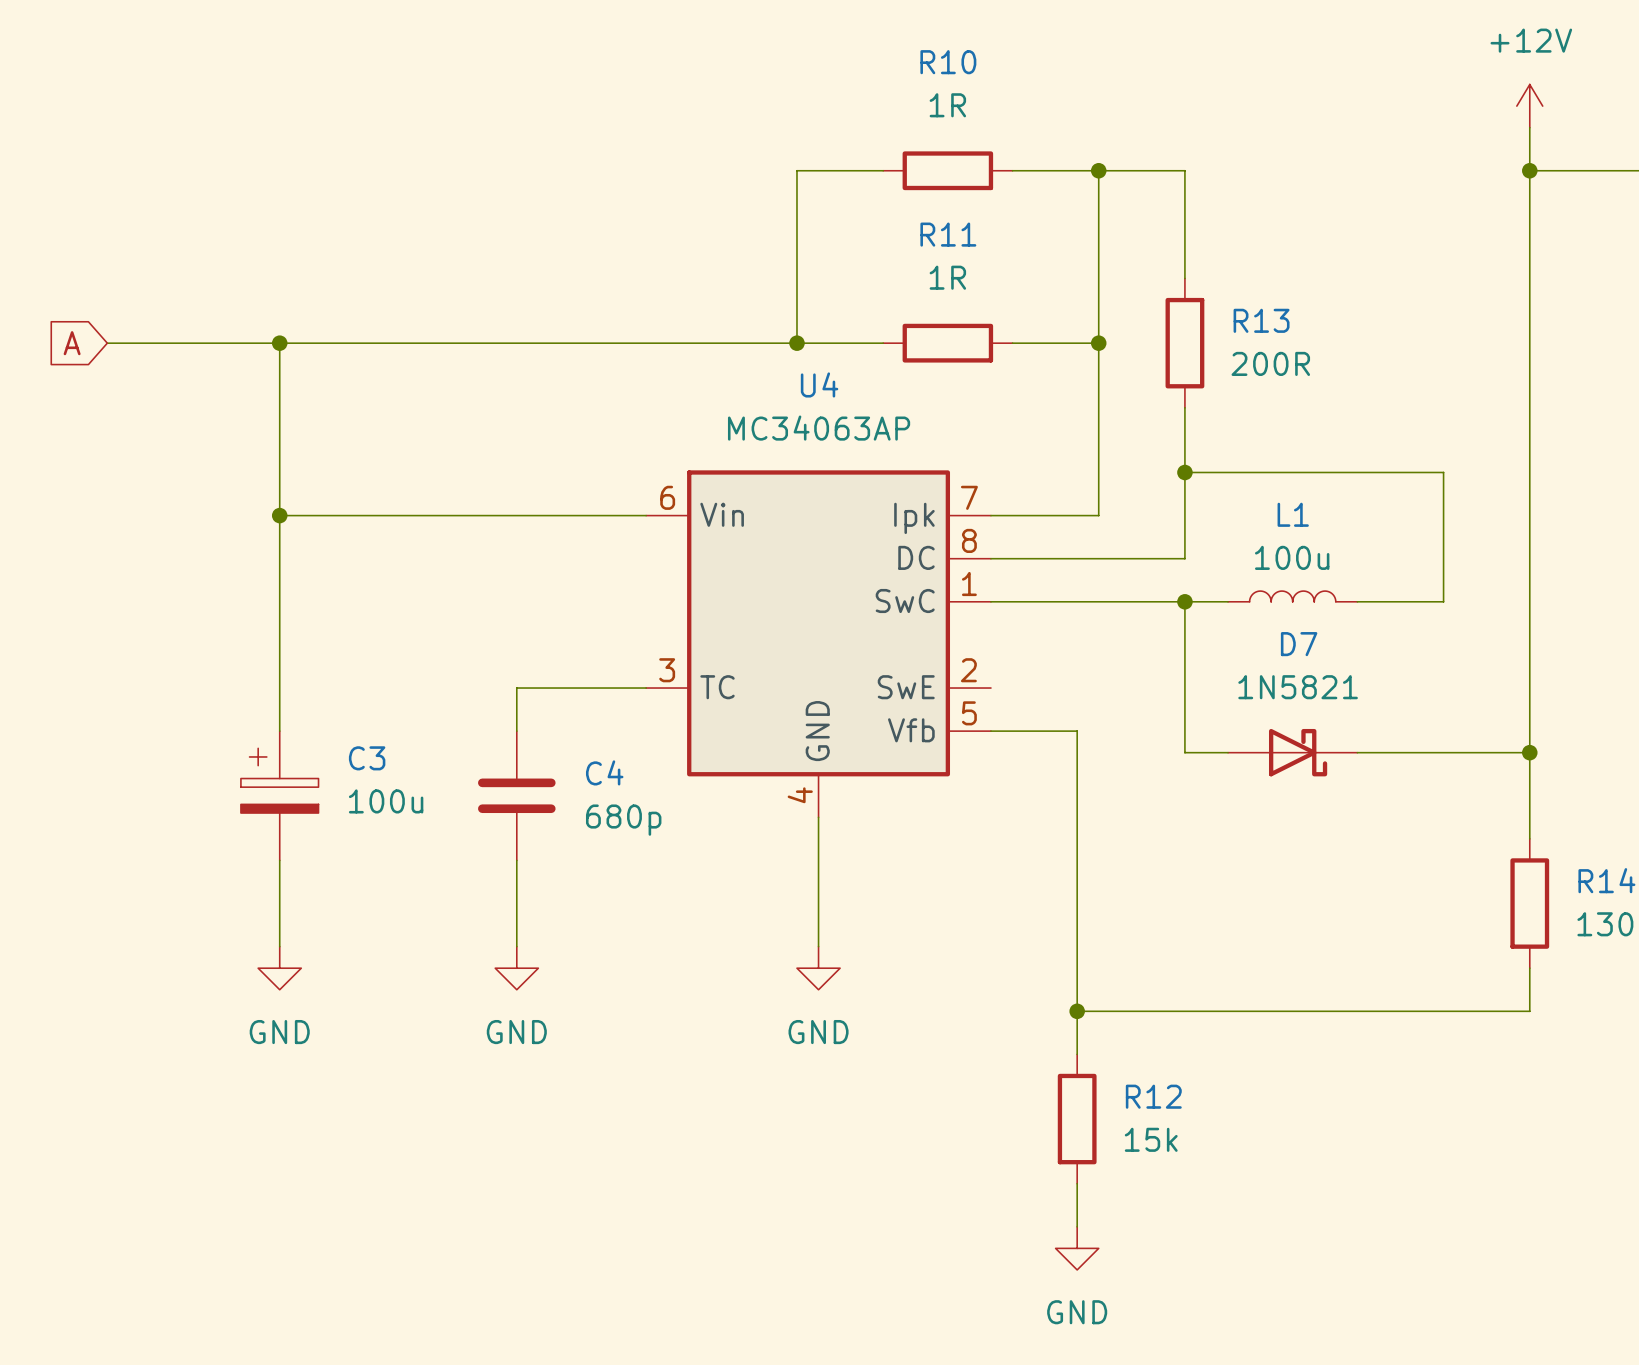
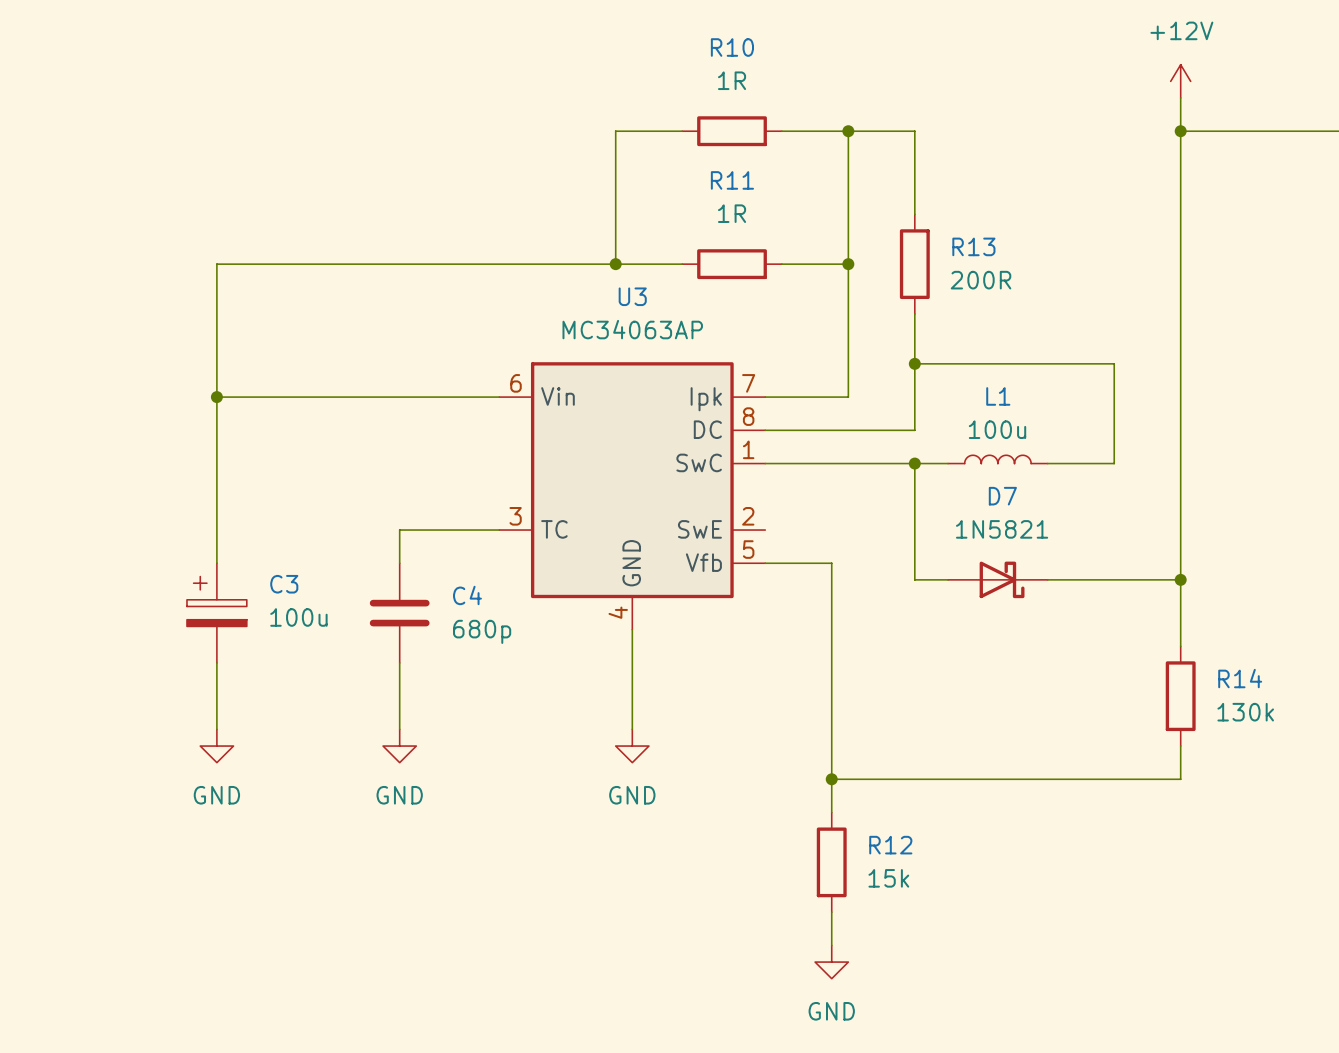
global label: A (72, 343) -> none
wire: (107, 343) (279, 343) -> none
junction: (279, 343) -> none
U4 name: U4 (819, 384) -> U3 (632, 296)

